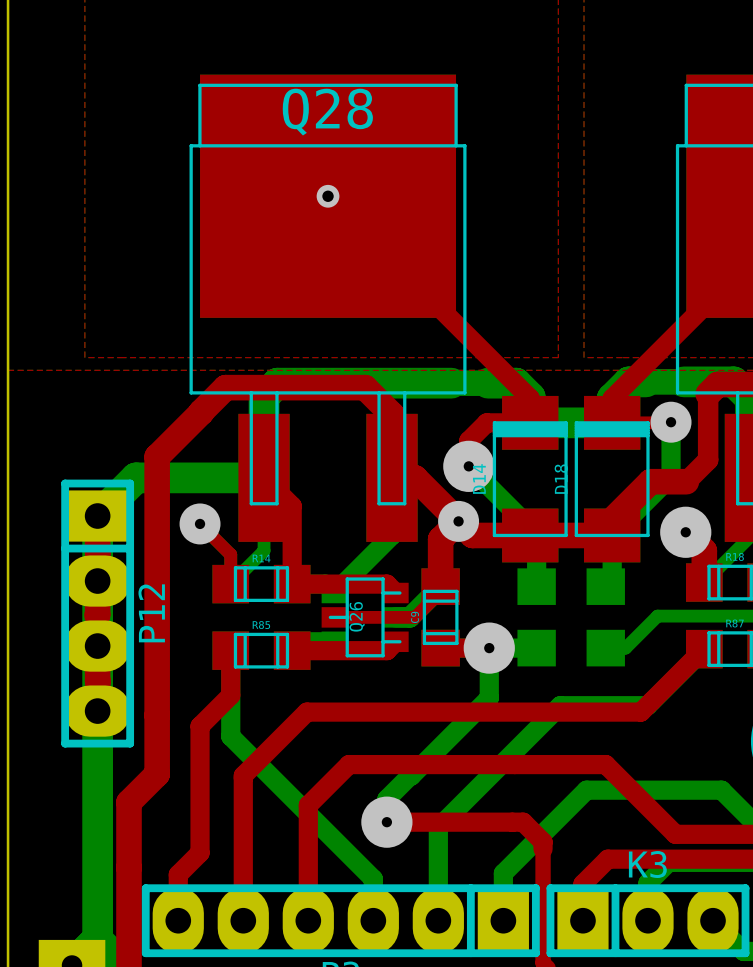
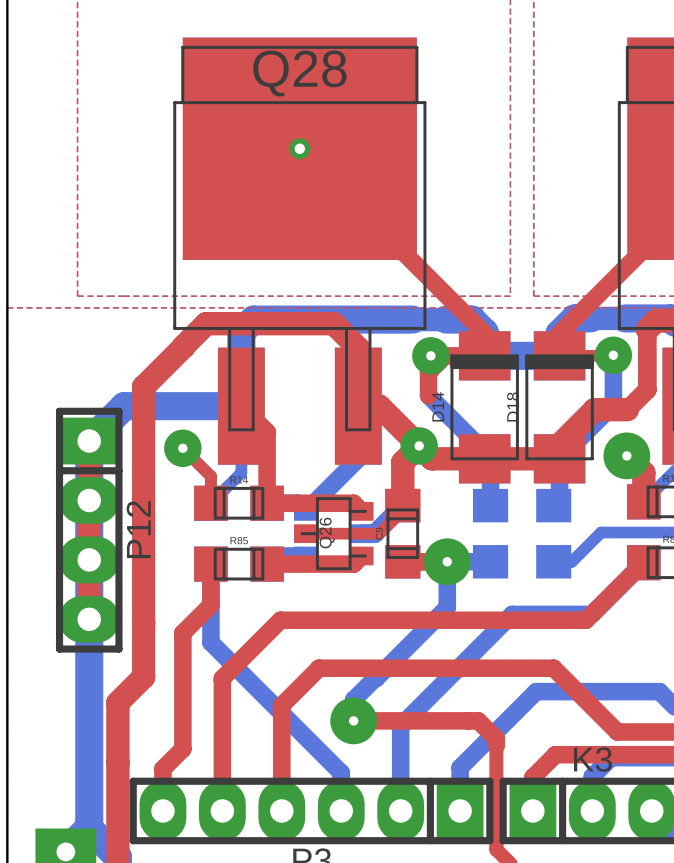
via: none -> (430, 355)
via: (468, 466) -> none

